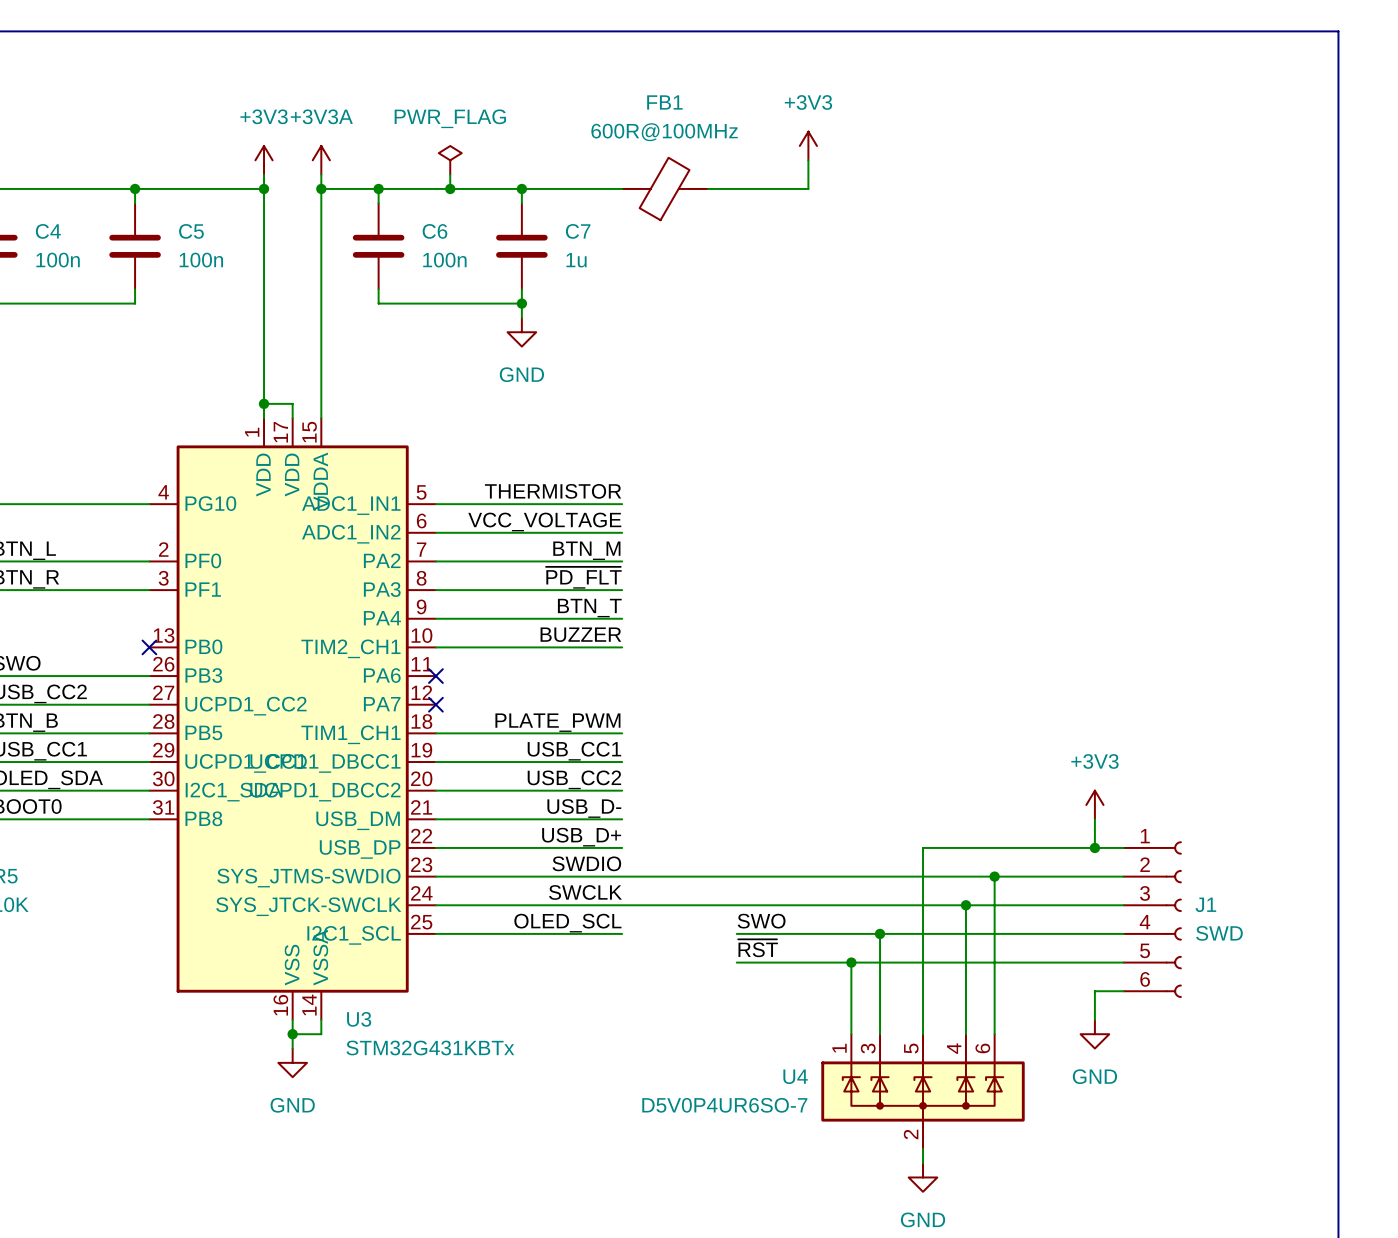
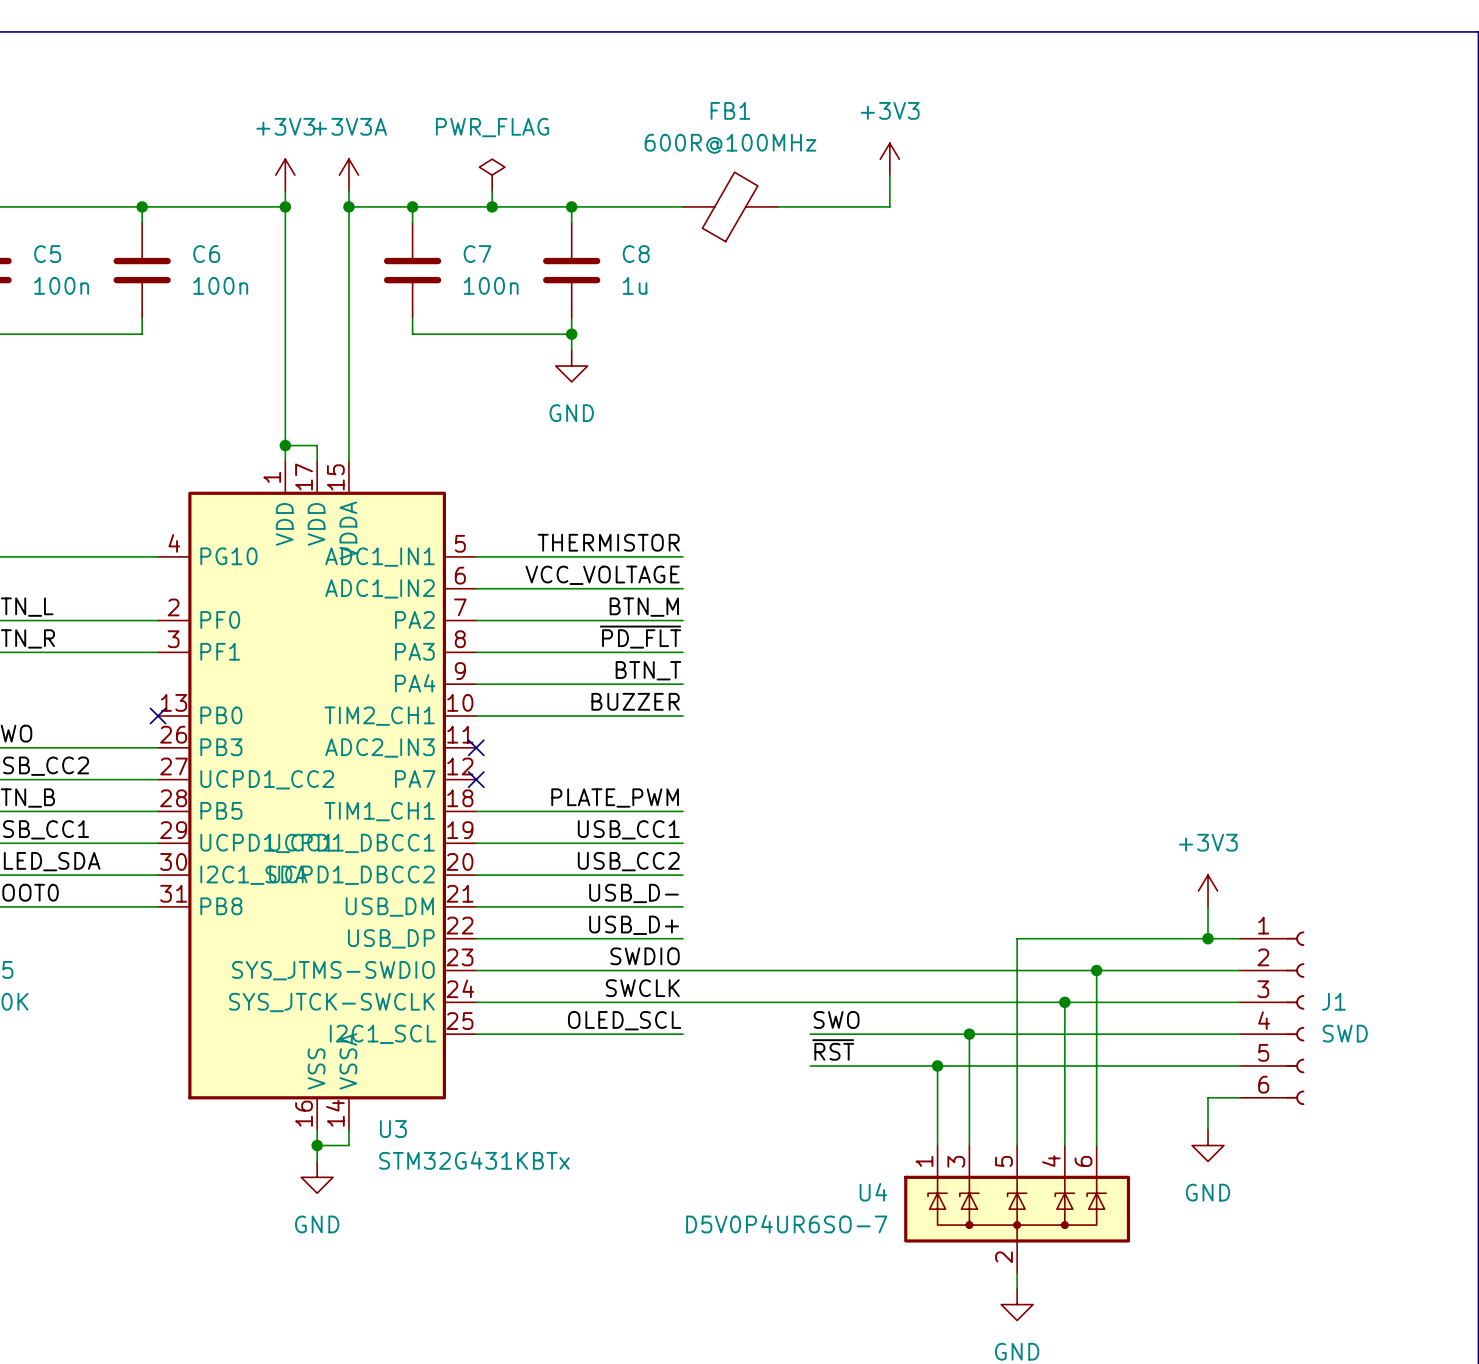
C4 name: C4 (48, 231) -> C5 (47, 254)
C5 name: C5 (191, 231) -> C6 (206, 254)
C6 name: C6 (434, 231) -> C7 (477, 254)
C7 name: C7 (578, 231) -> C8 (636, 254)
U3 pin name: PA6 (382, 675) -> ADC2_IN3 (379, 747)

